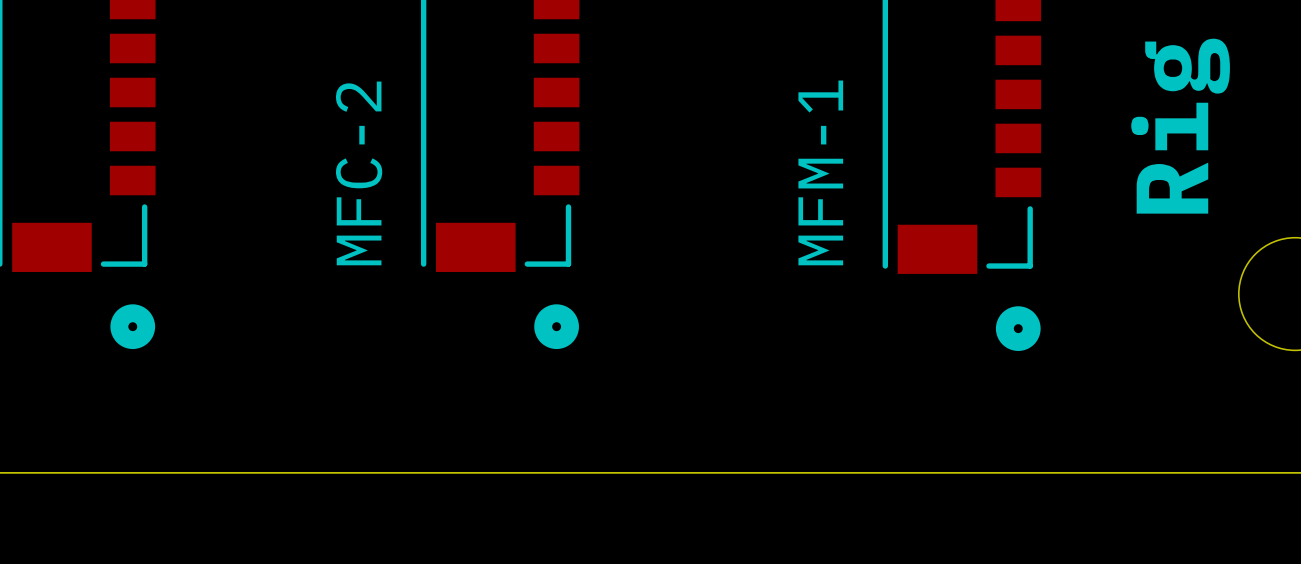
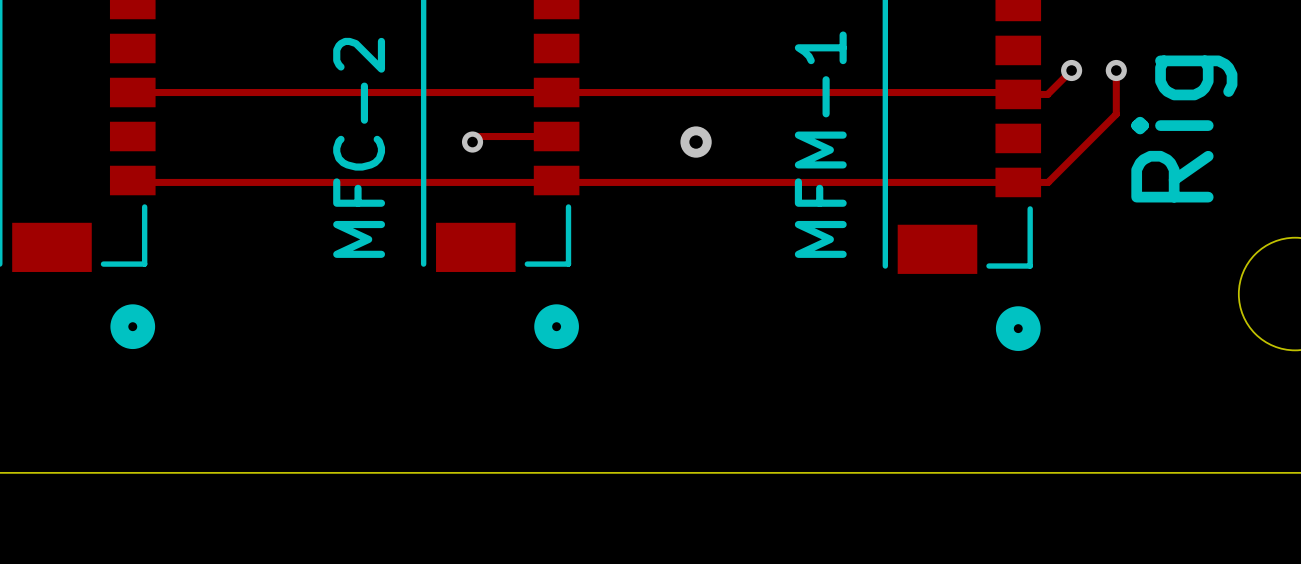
track: none -> (1071, 70) (1047, 94) (1018, 94) (1016, 92) (132, 92)
via: none -> (1071, 70)
track: none -> (1116, 70) (1116, 114) (1048, 182) (134, 182) (132, 180)
via: none -> (1116, 70)
track: none -> (556, 136) (478, 136) (472, 142)
via: none -> (472, 142)
via: none -> (696, 142)

